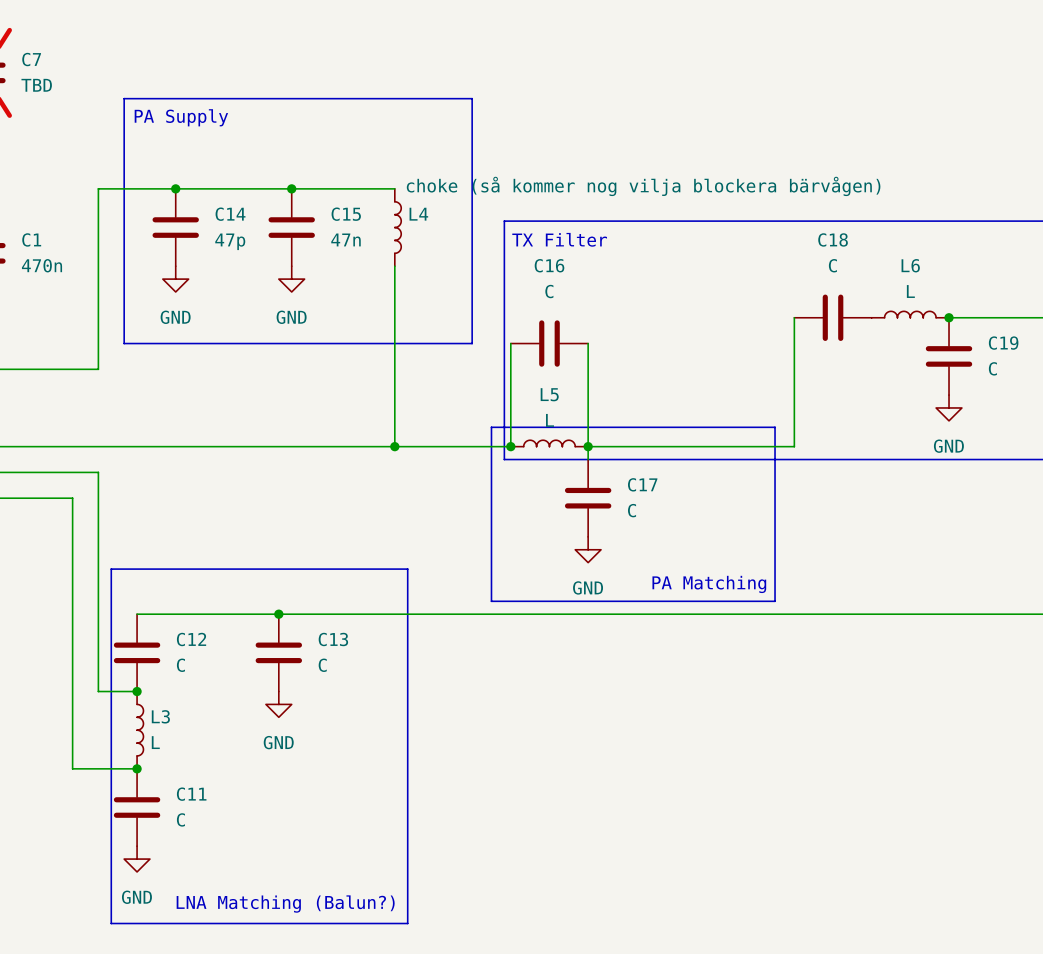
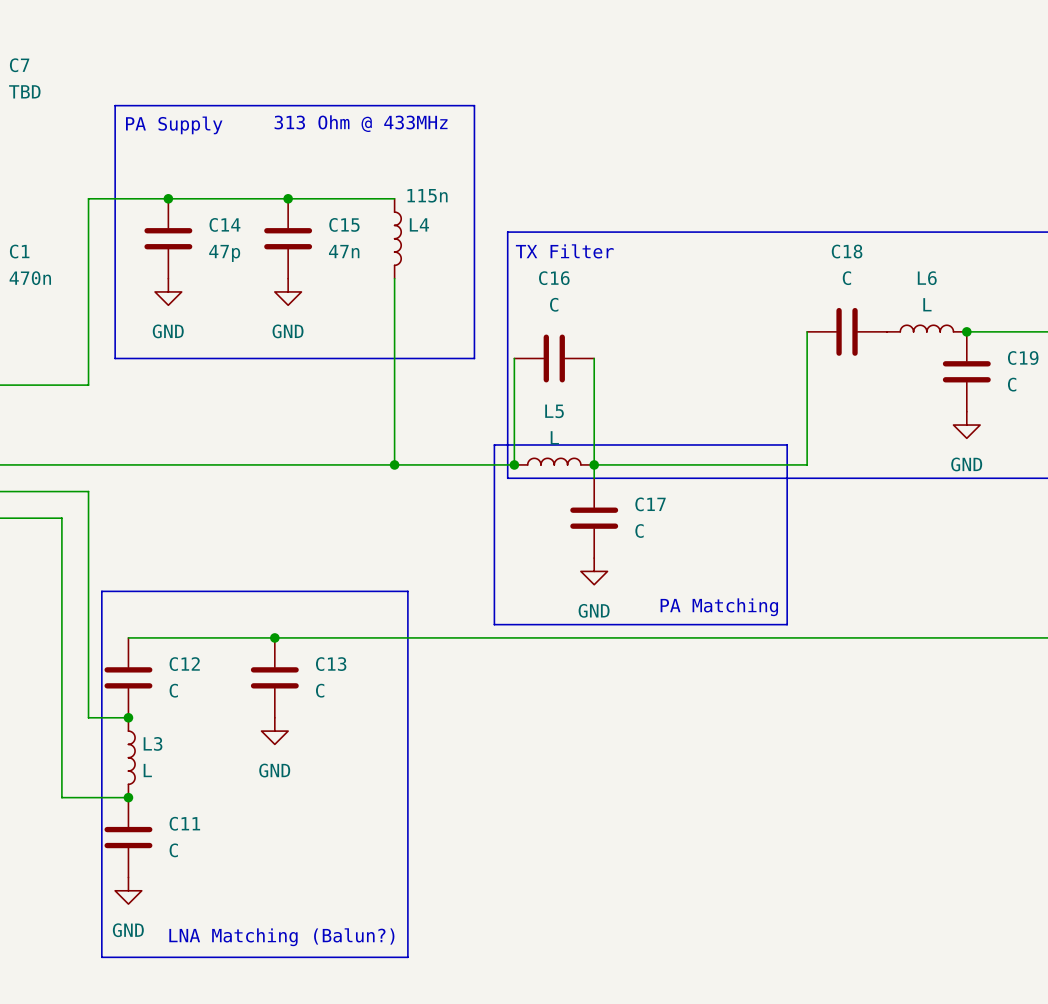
text: none -> 313 Ohm @ 433MHz (361, 123)
L4 value: choke (så kommer nog vilja blockera bärvågen) (643, 186) -> 115n (427, 195)

